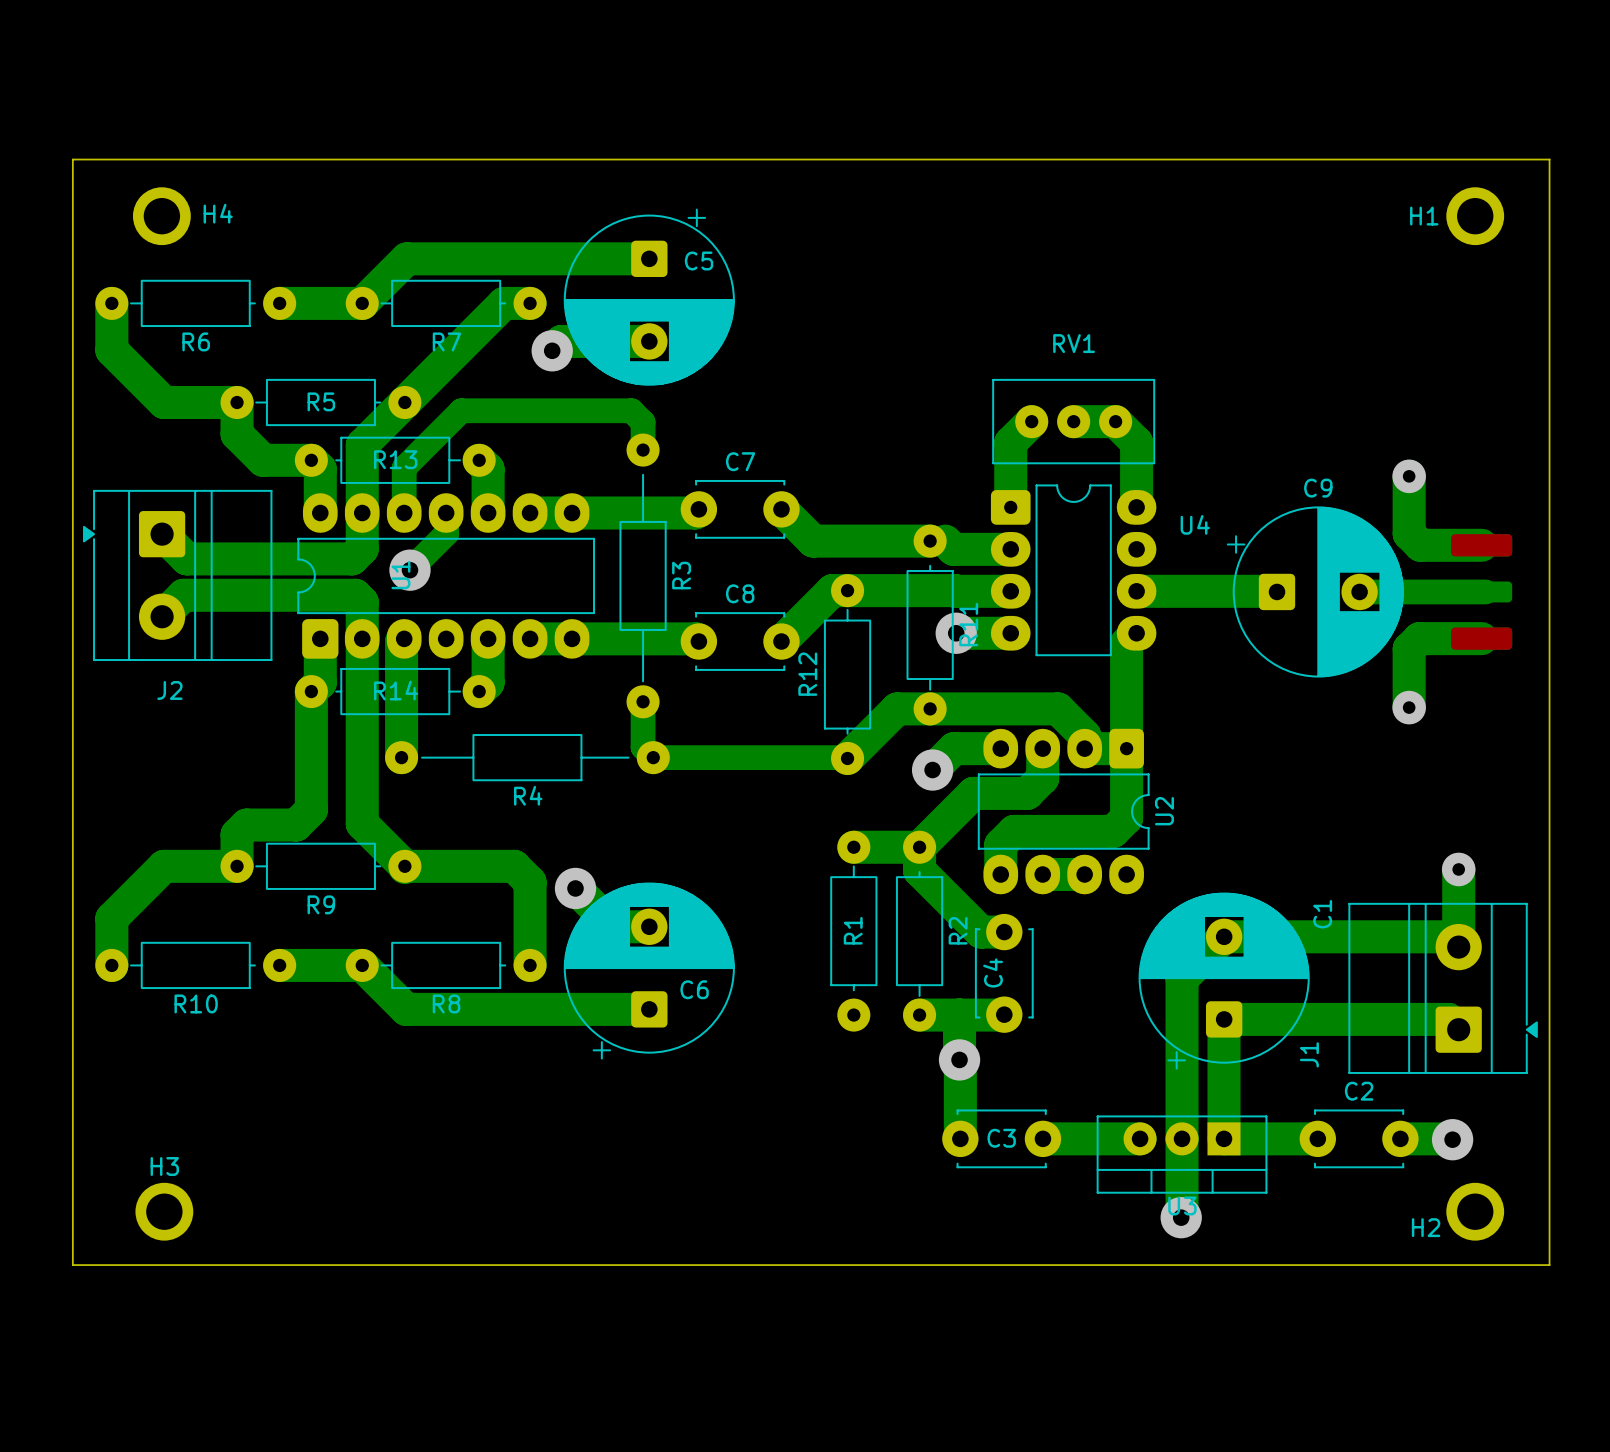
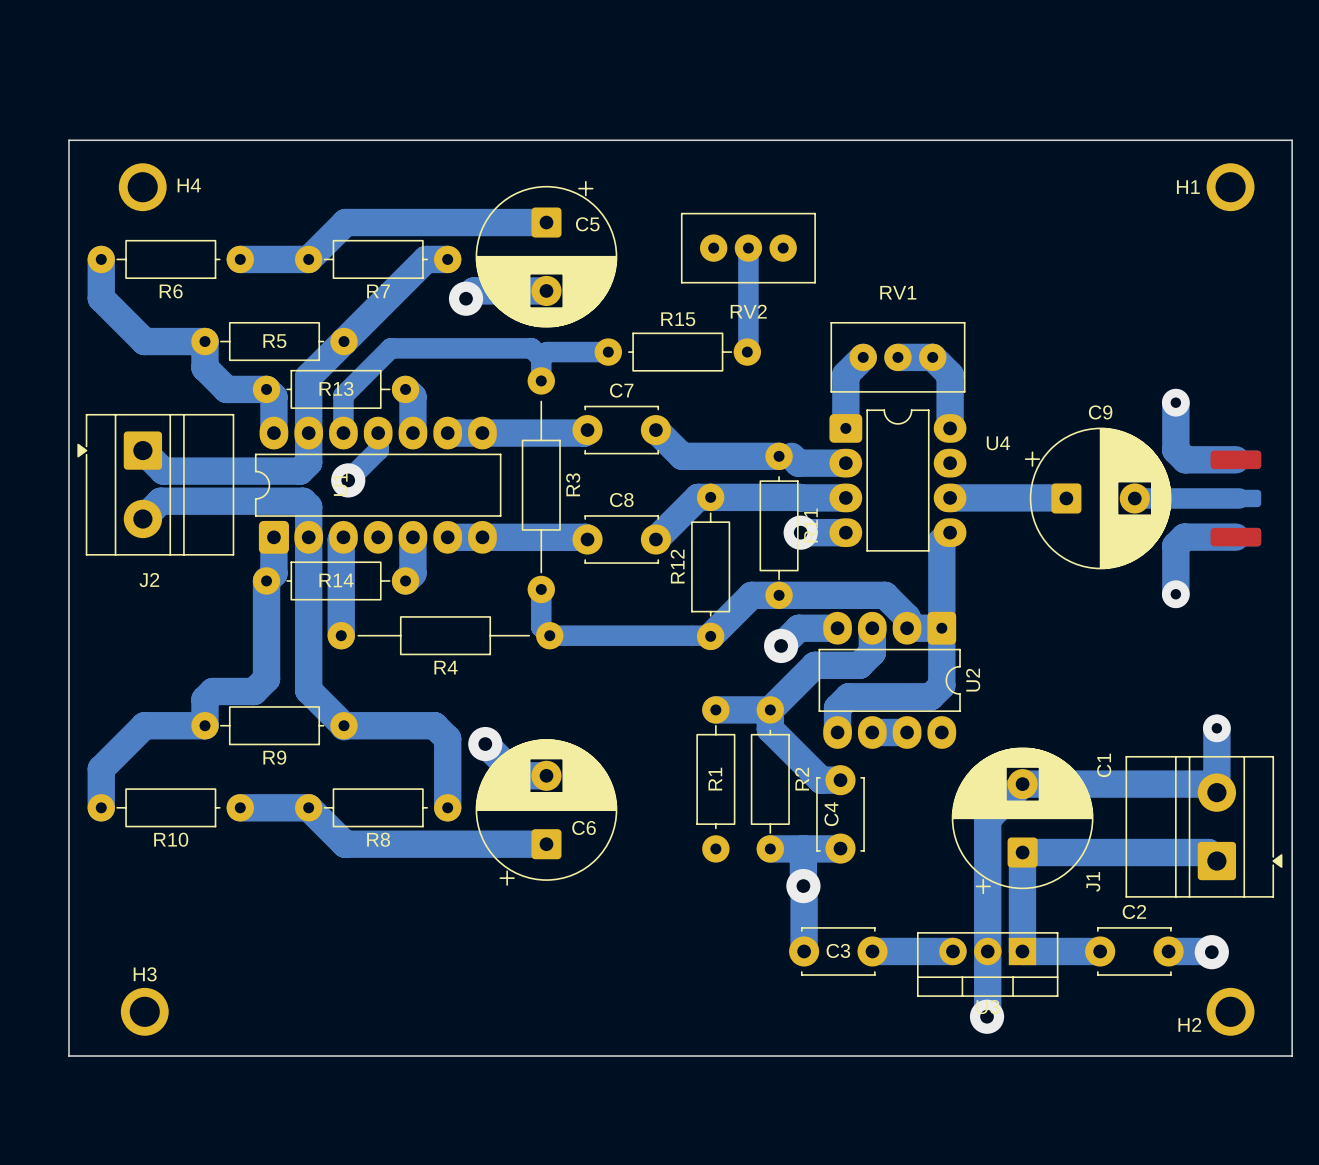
bottom track: none -> (748, 248) (747, 352)
RV2: none -> (748, 248)
bottom track: none -> (608, 352) (547, 352) (541, 357)
R15: none -> (677, 352)

